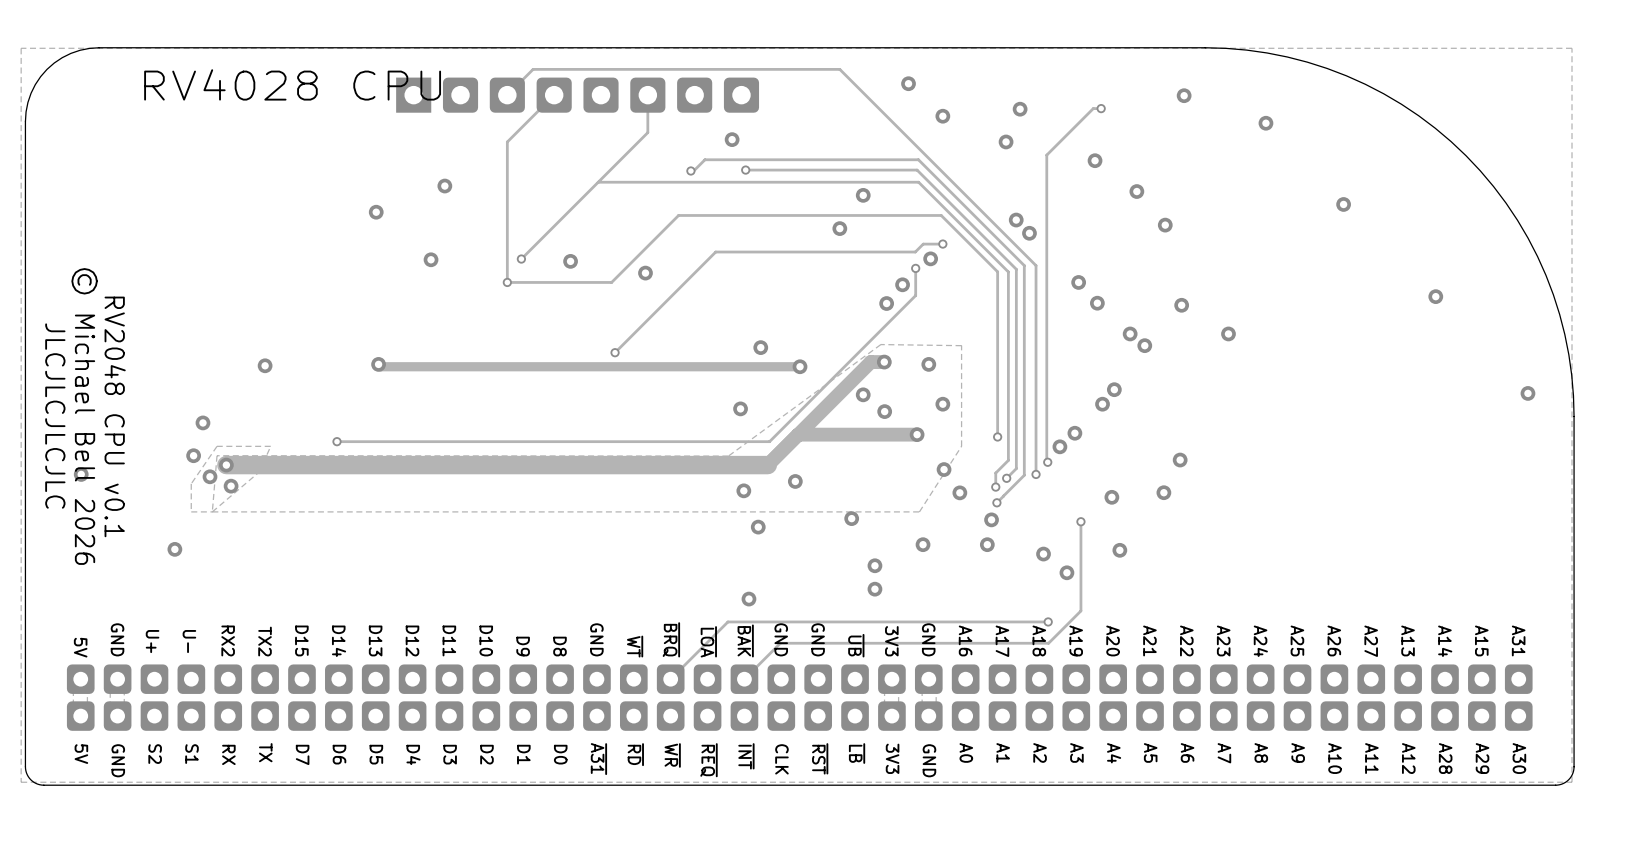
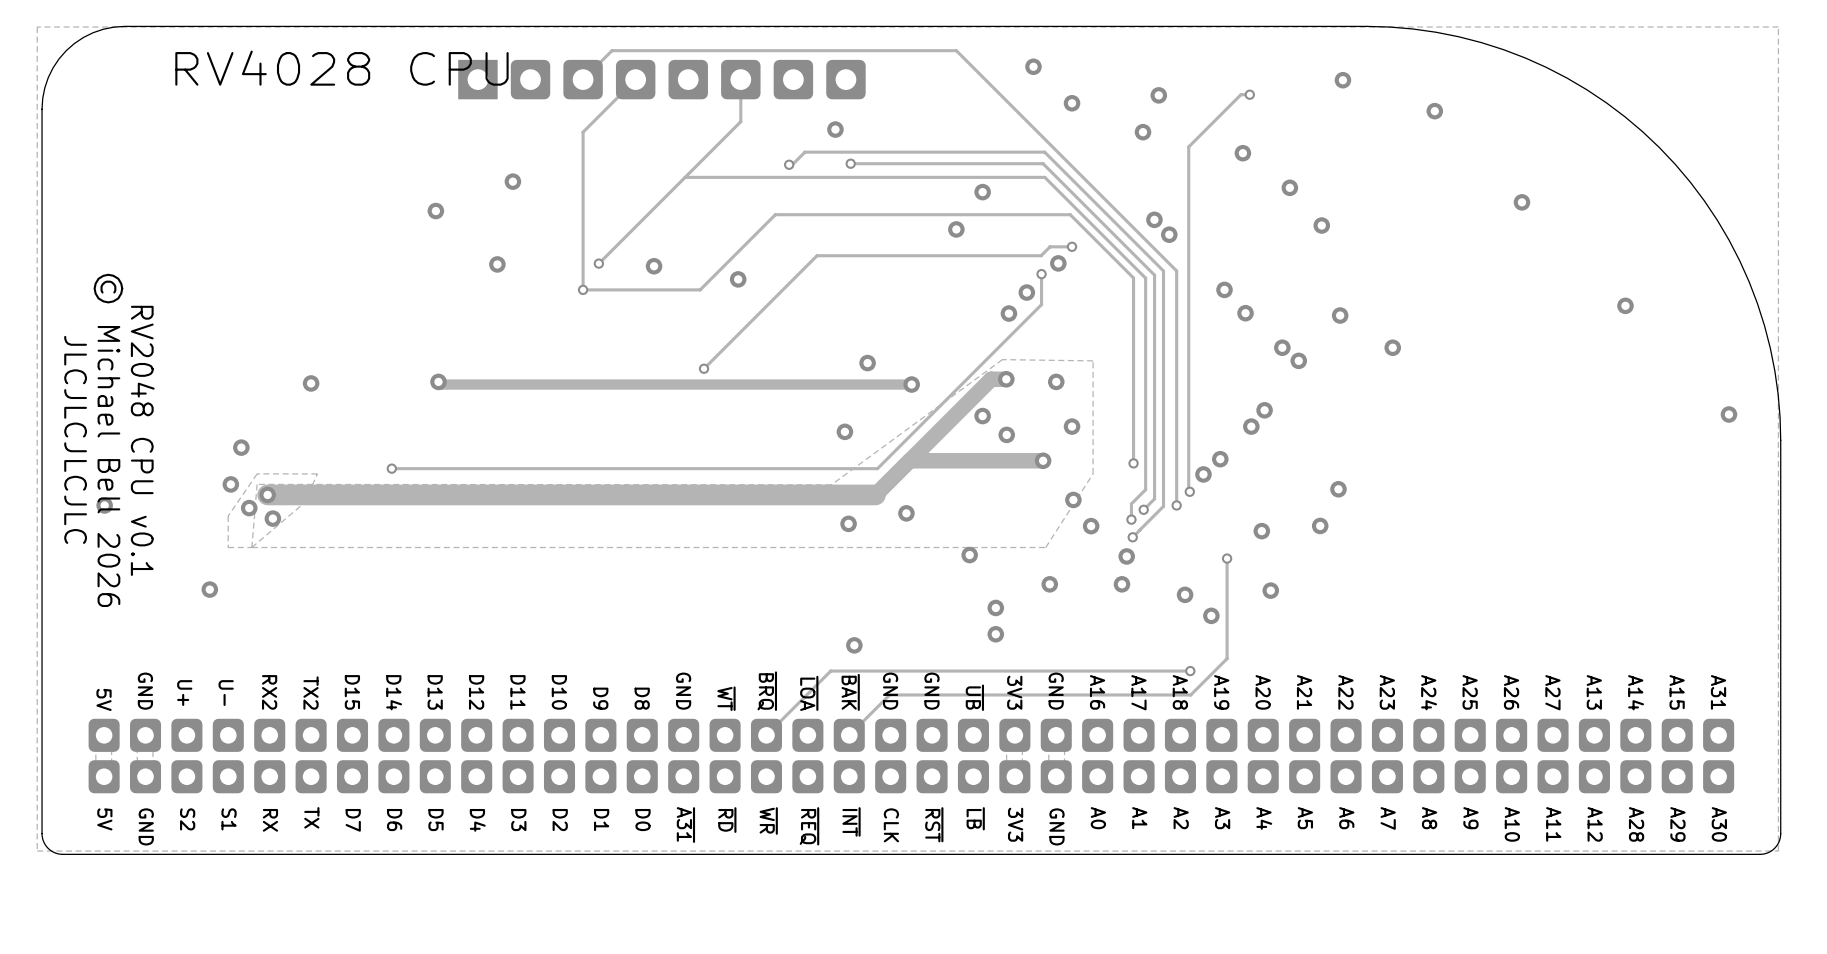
via: (758, 527) -> none

